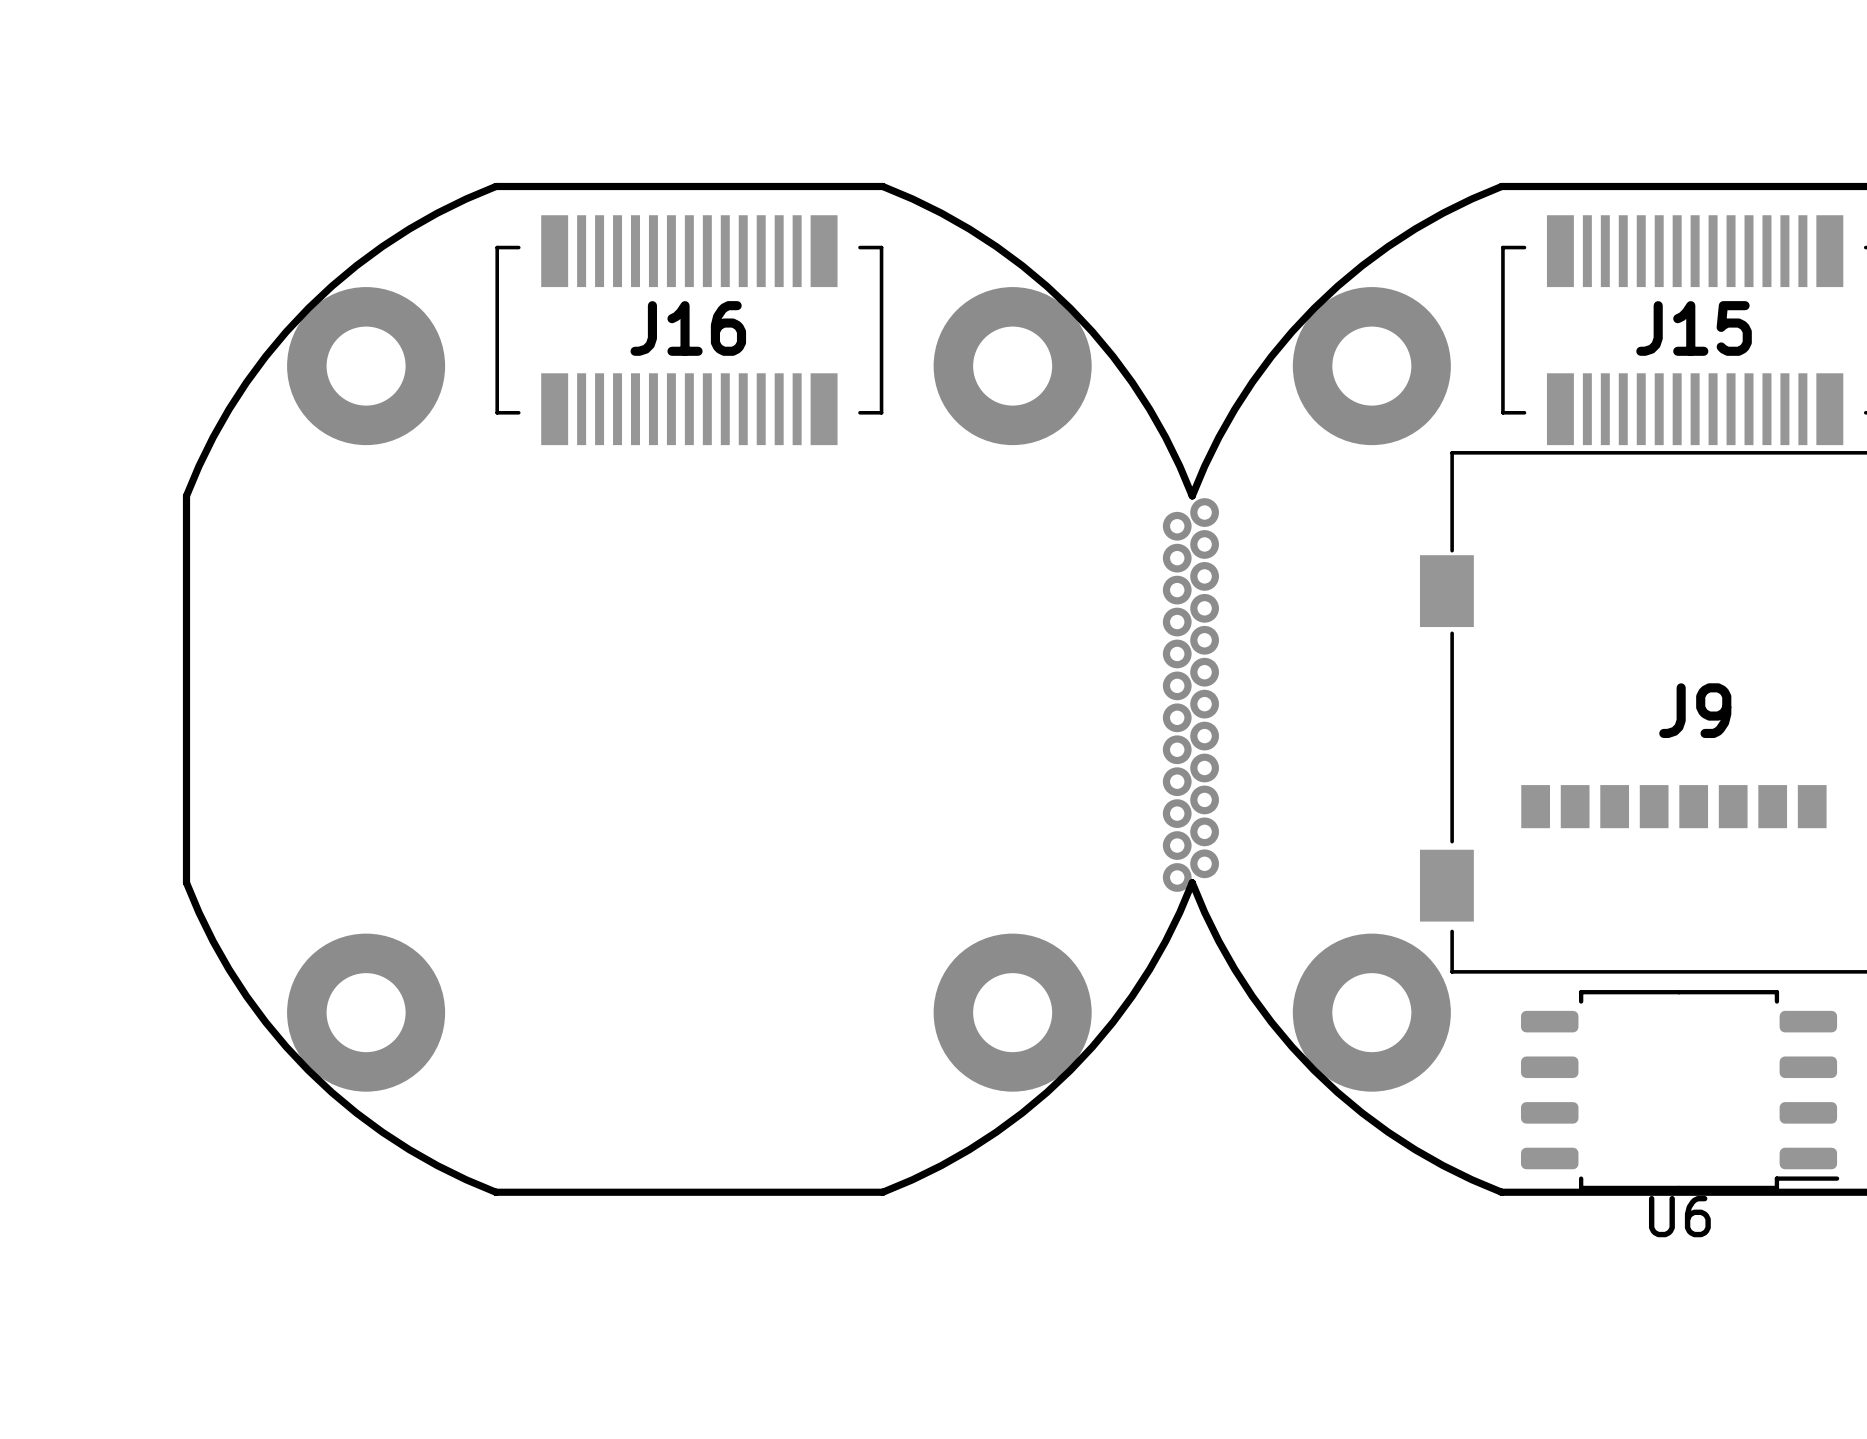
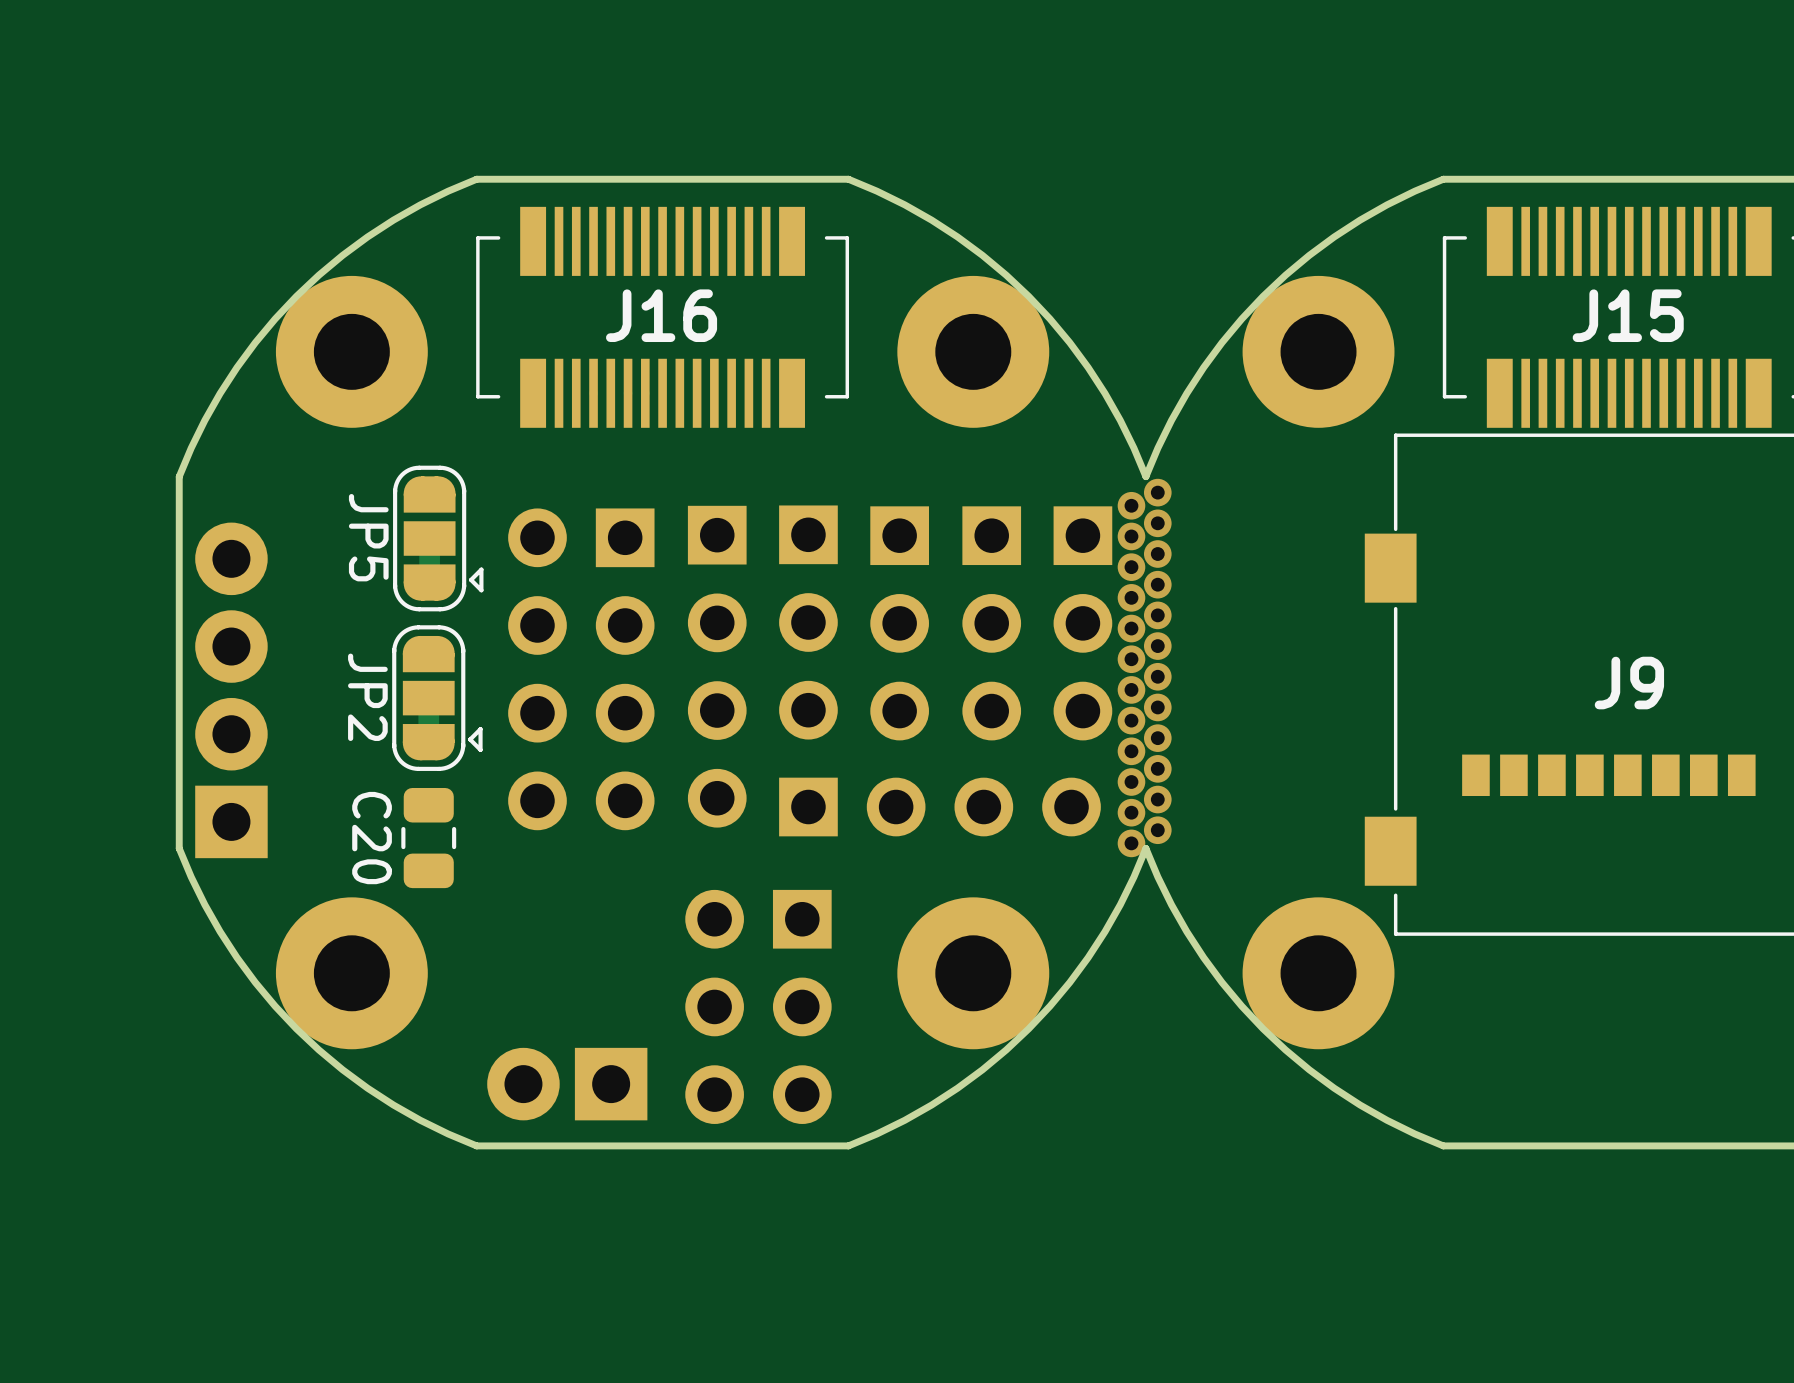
JP5: none -> (438, 538)
part: none -> (808, 622)
part: none -> (899, 623)
part: none -> (991, 623)
part: none -> (1082, 623)
part: none -> (717, 666)
part: none -> (581, 669)
part: none -> (231, 690)
JP2: none -> (437, 698)
part: none -> (939, 807)
C20: none -> (428, 838)
part: none -> (758, 1006)
U6: (1680, 1090) -> none
part: none -> (567, 1084)

